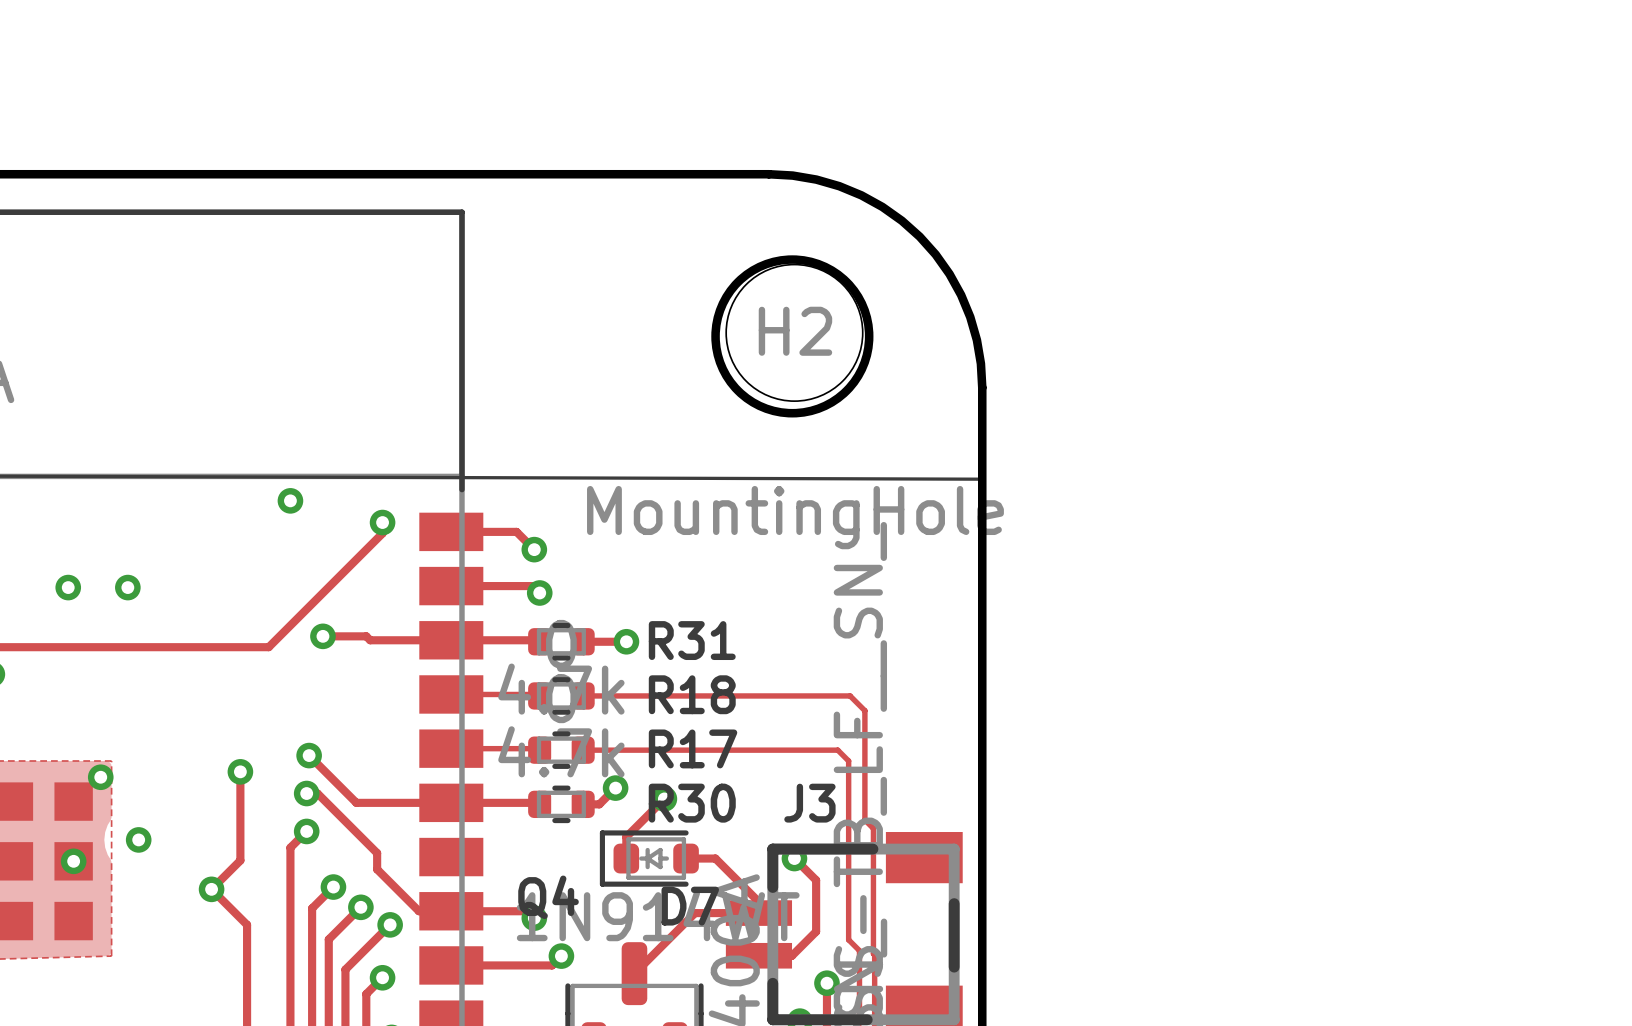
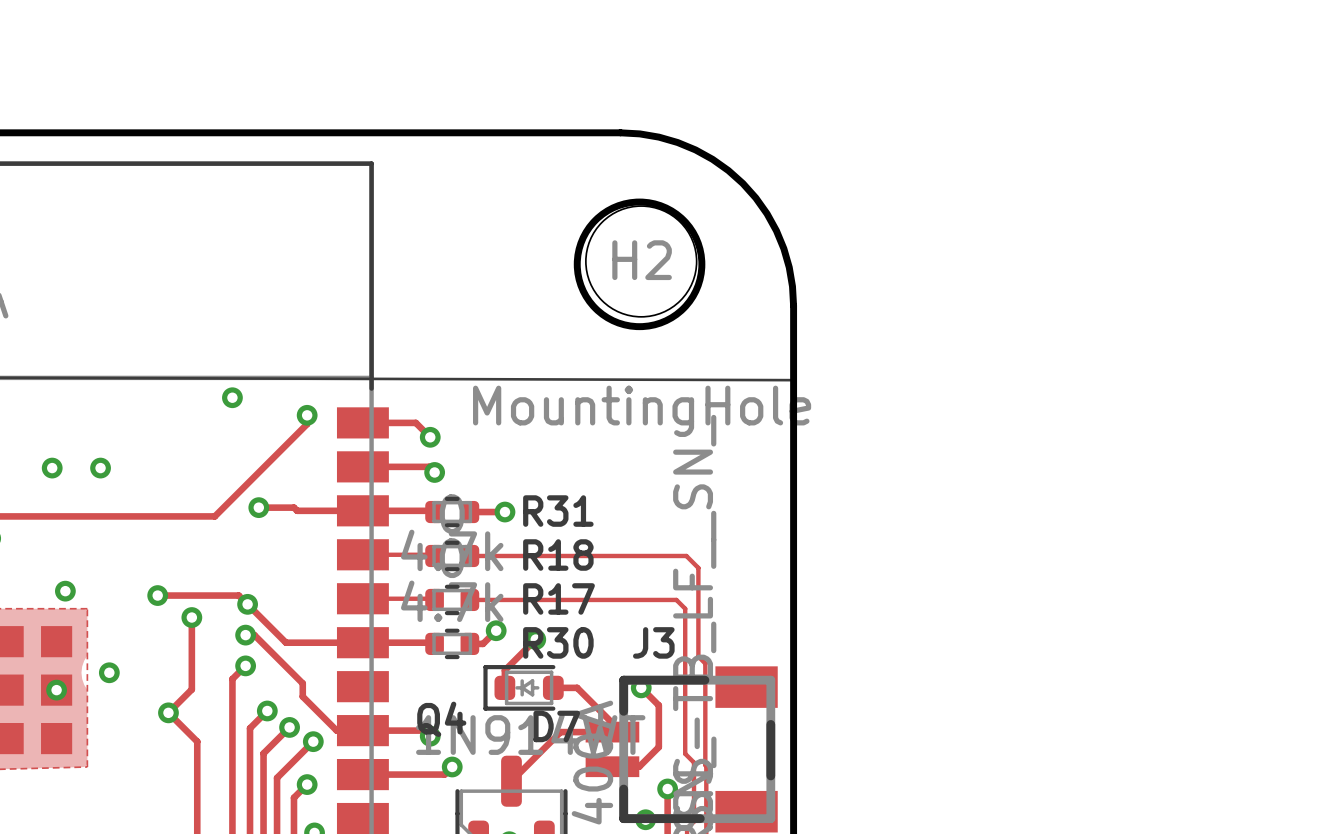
track: none -> (157, 595) (238, 595) (247, 604)
via: none -> (157, 595)
via position: (100, 777) -> (65, 591)

